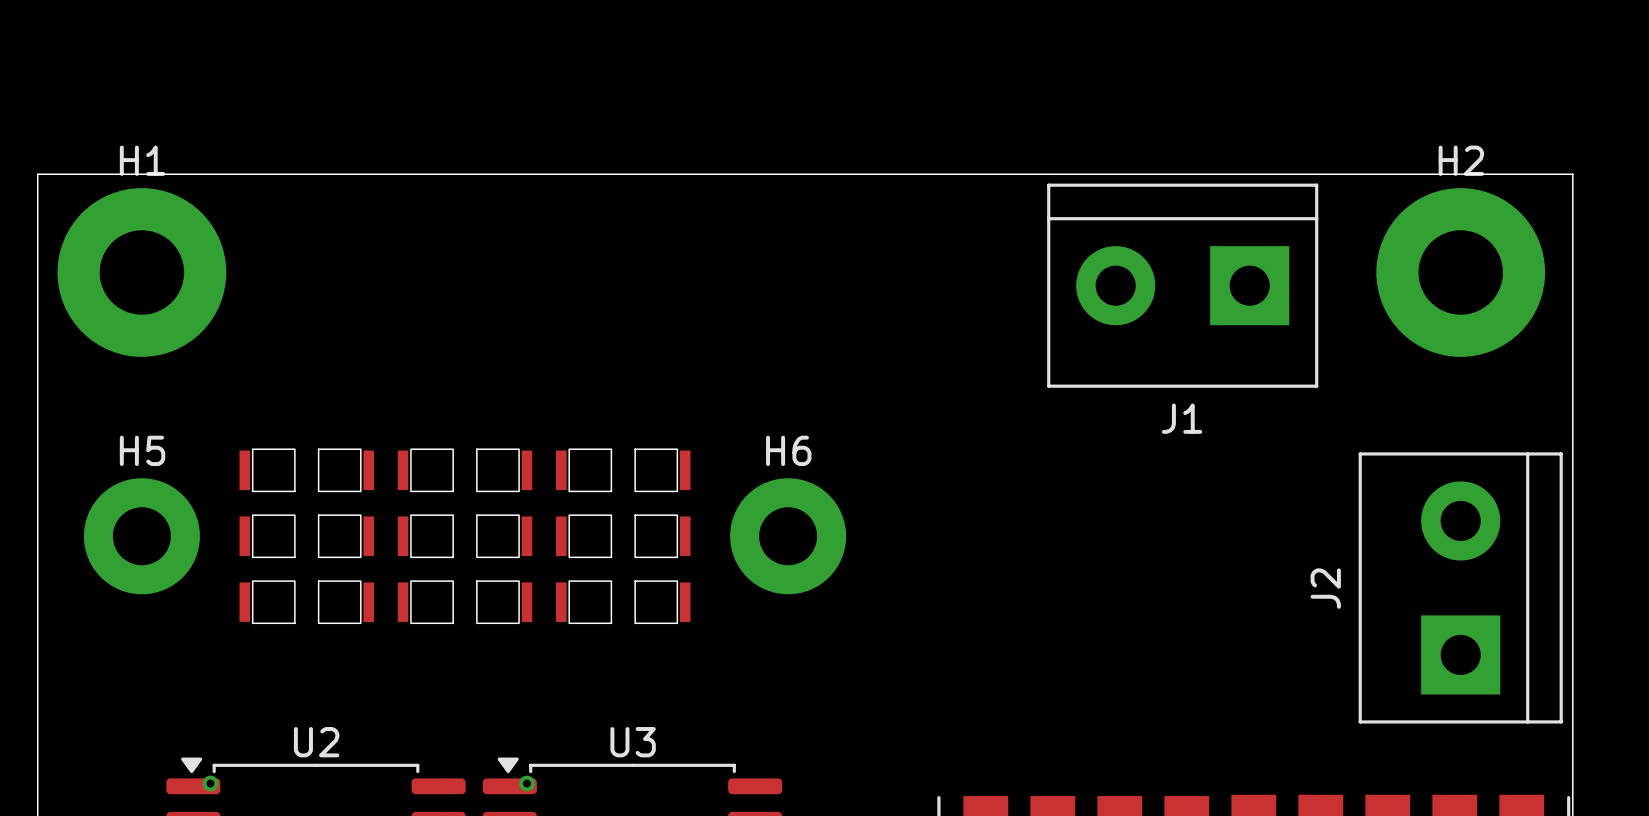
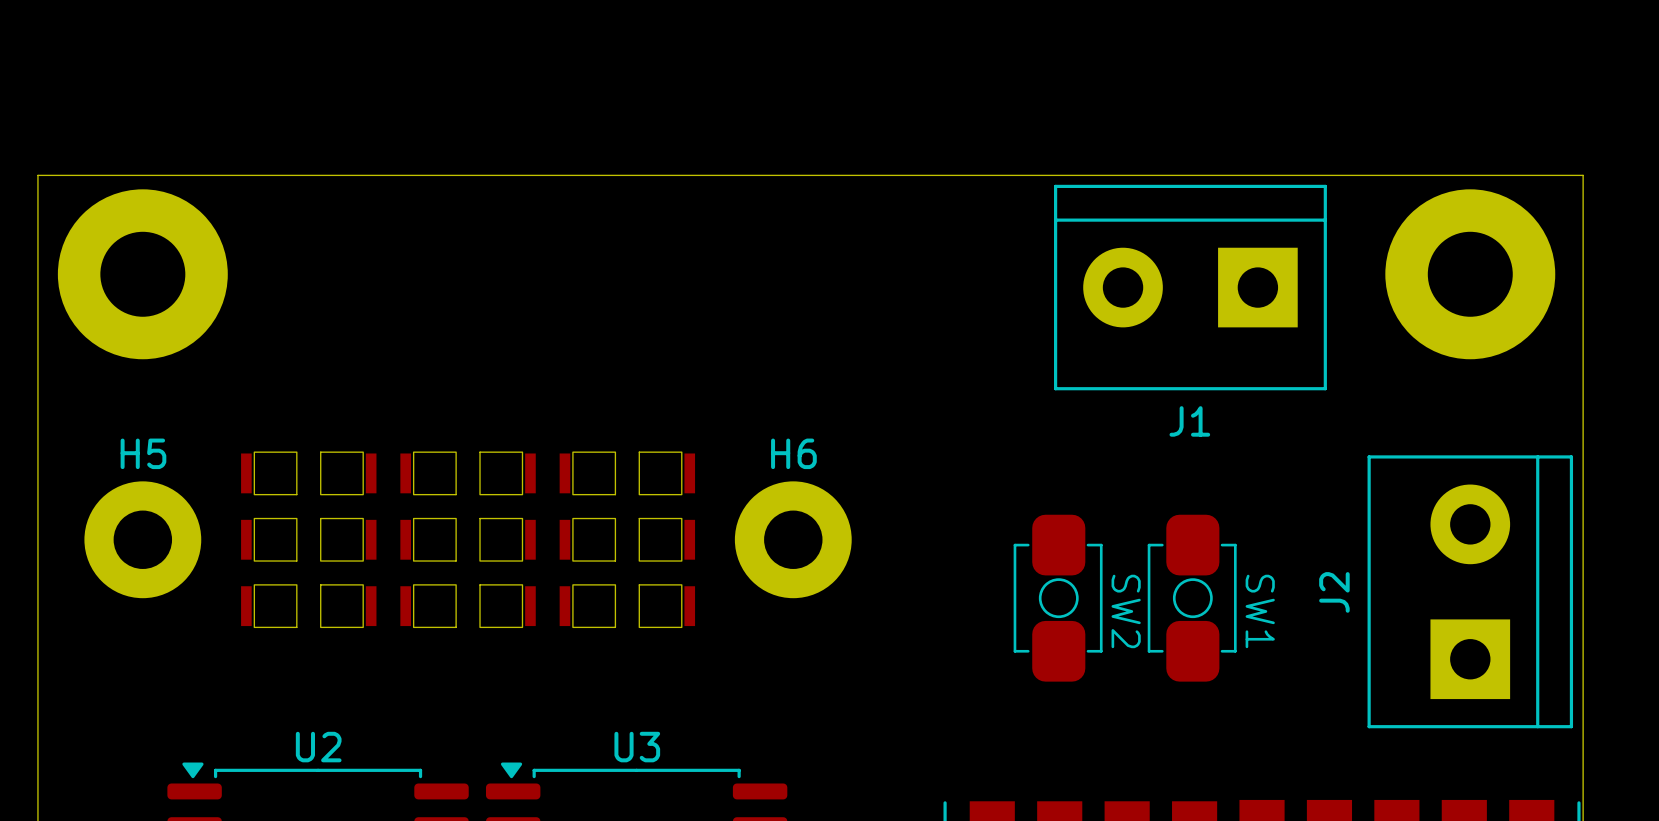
H1 name: H1 (142, 160) -> none
H2 name: H2 (1461, 160) -> none
SW2: none -> (1058, 598)
SW1: none -> (1192, 598)
via: (210, 783) -> none
via: (526, 783) -> none

